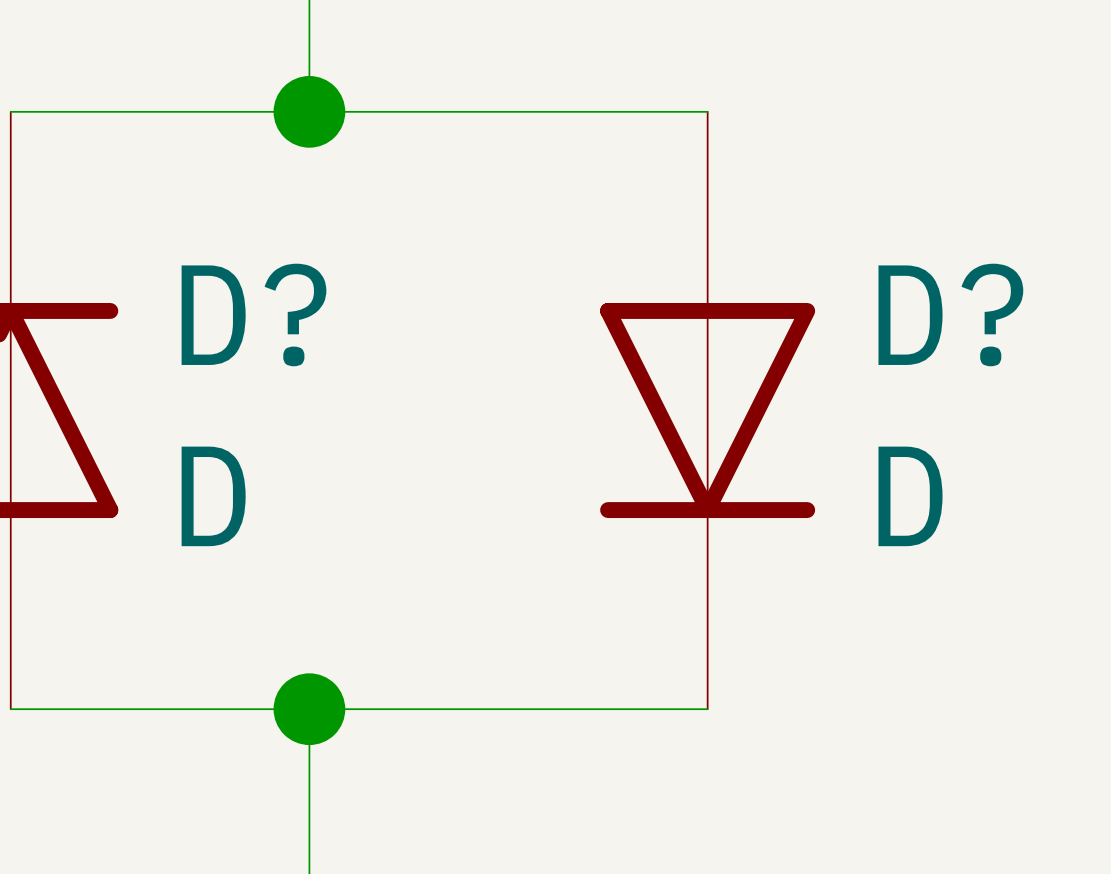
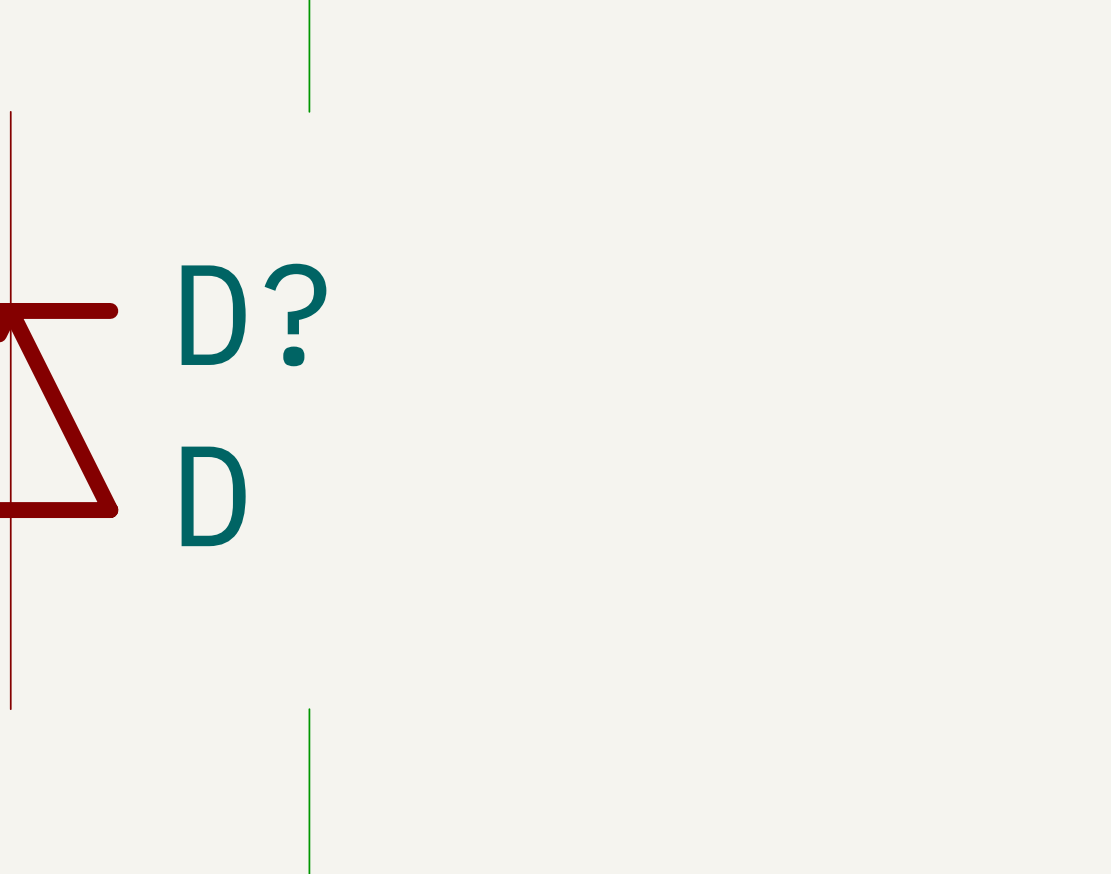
wire: (10, 111) (707, 111) -> none
junction: (309, 111) -> none
D?: D (707, 410) -> none
wire: (10, 709) (707, 709) -> none
junction: (309, 709) -> none

